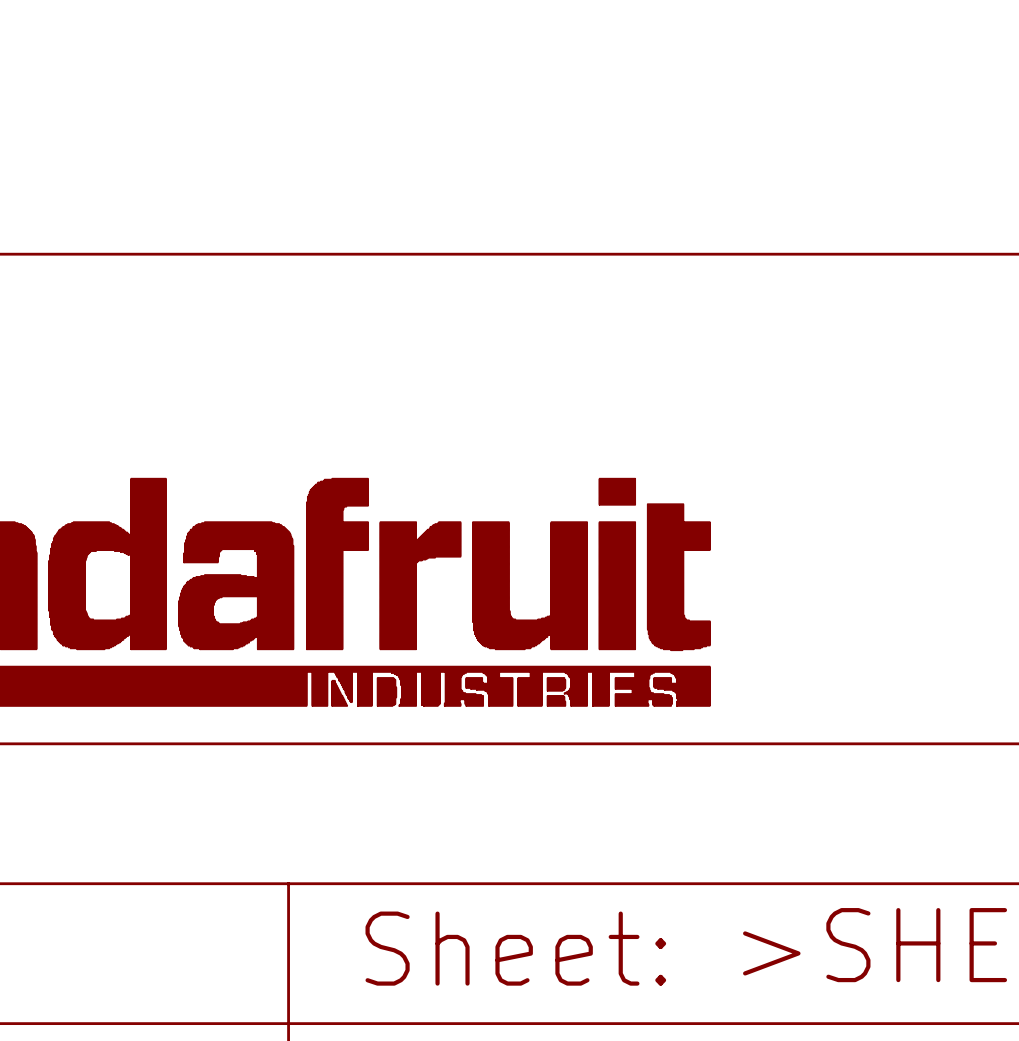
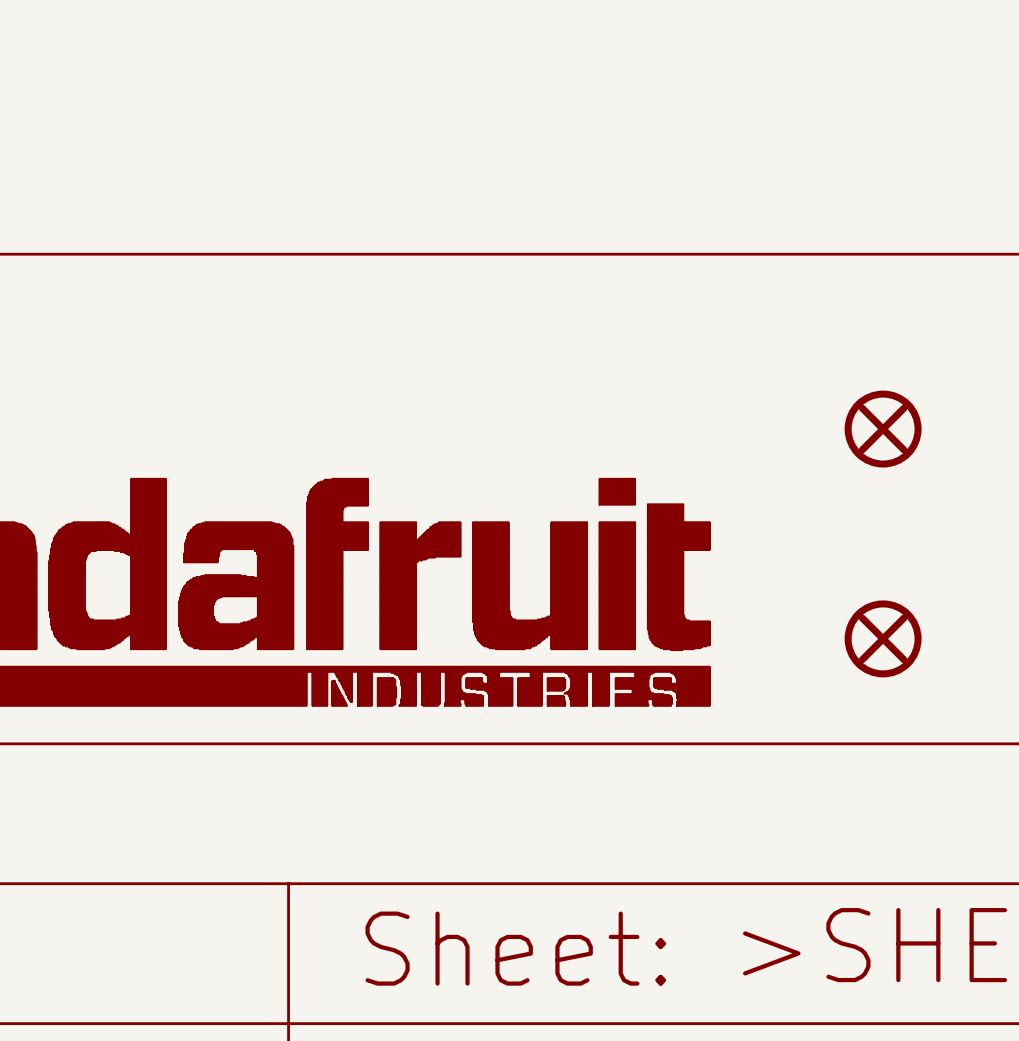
part: none -> (883, 429)
part: none -> (883, 638)

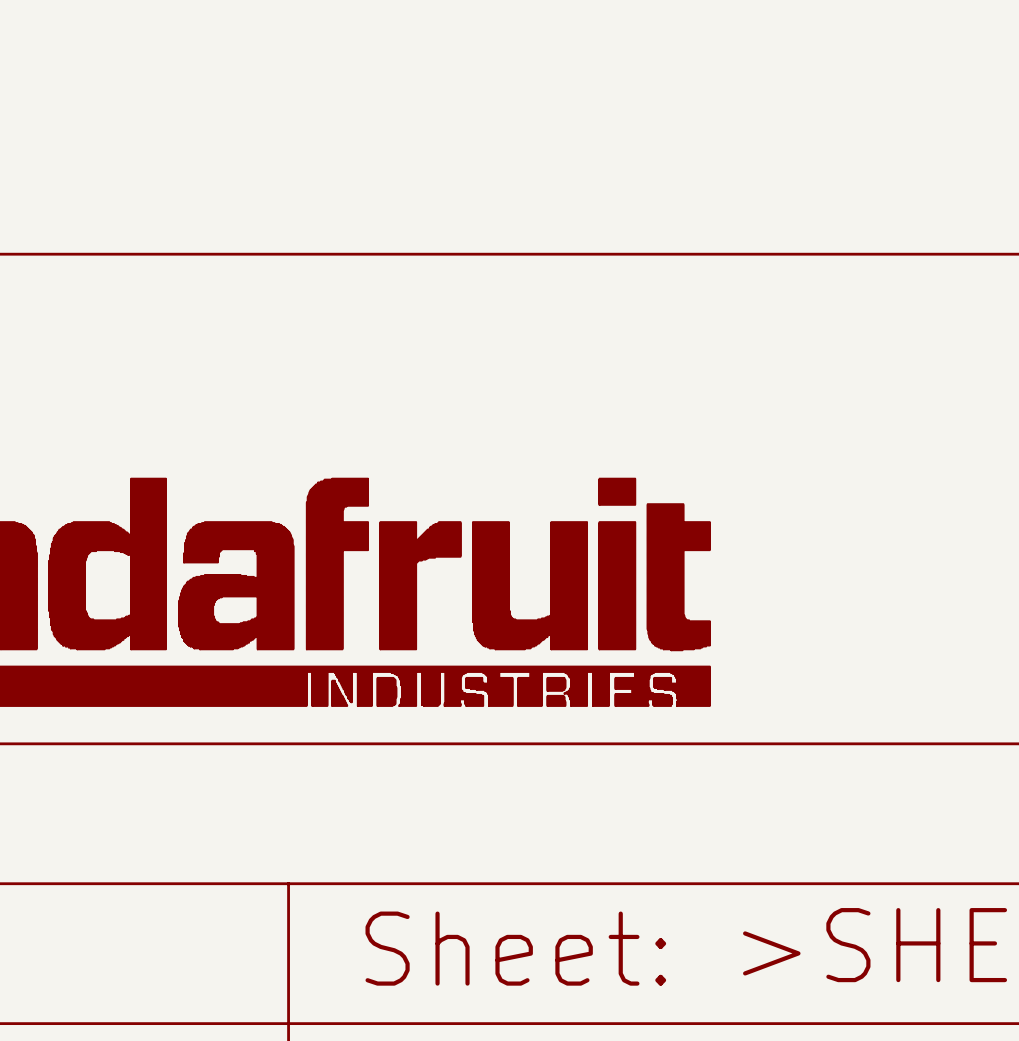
part: (883, 429) -> none
part: (883, 638) -> none

